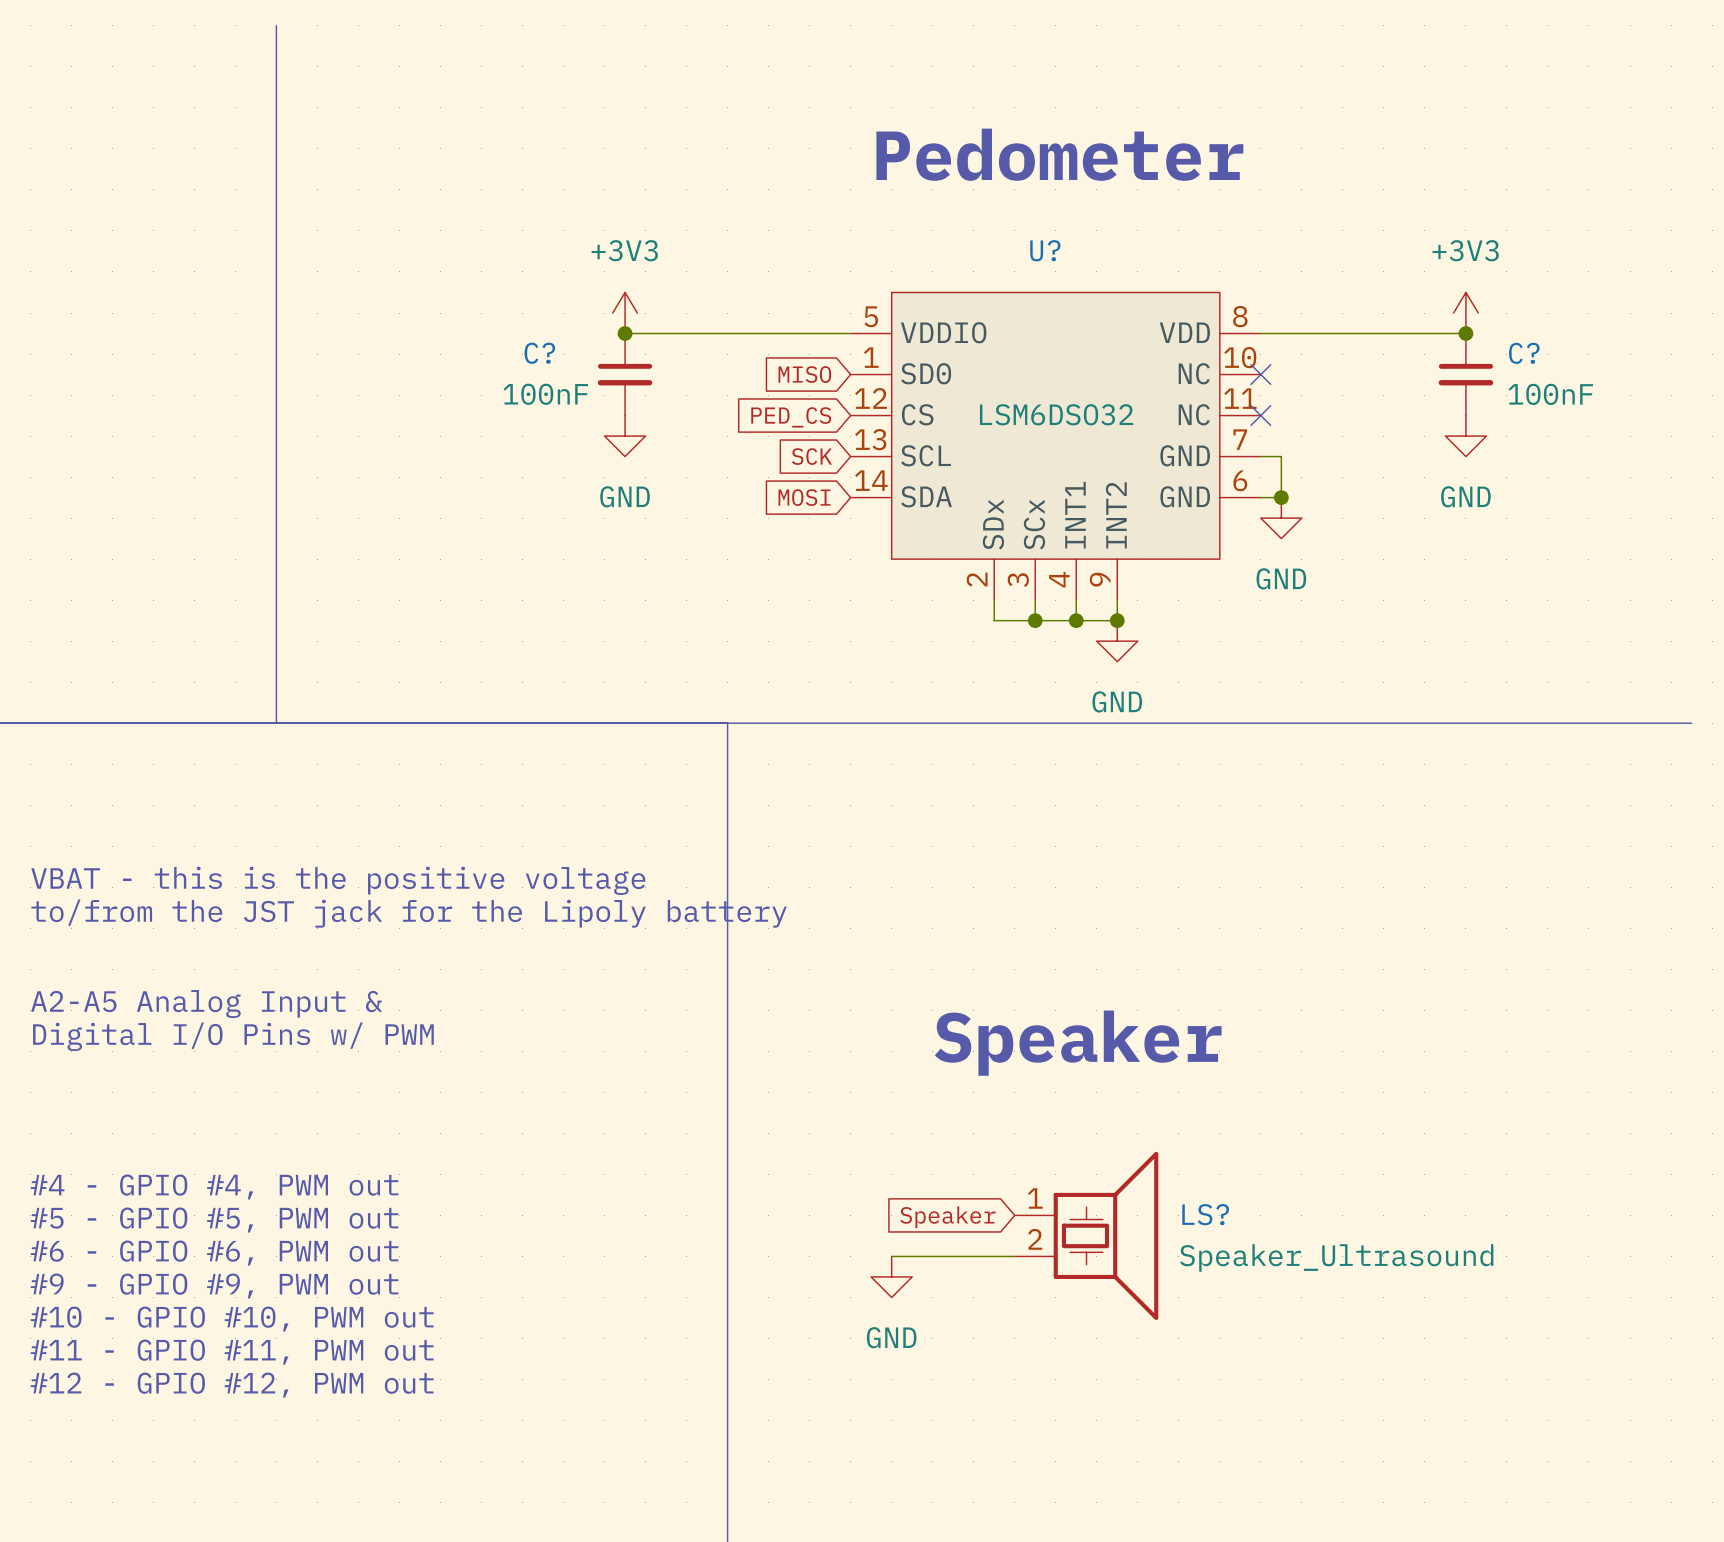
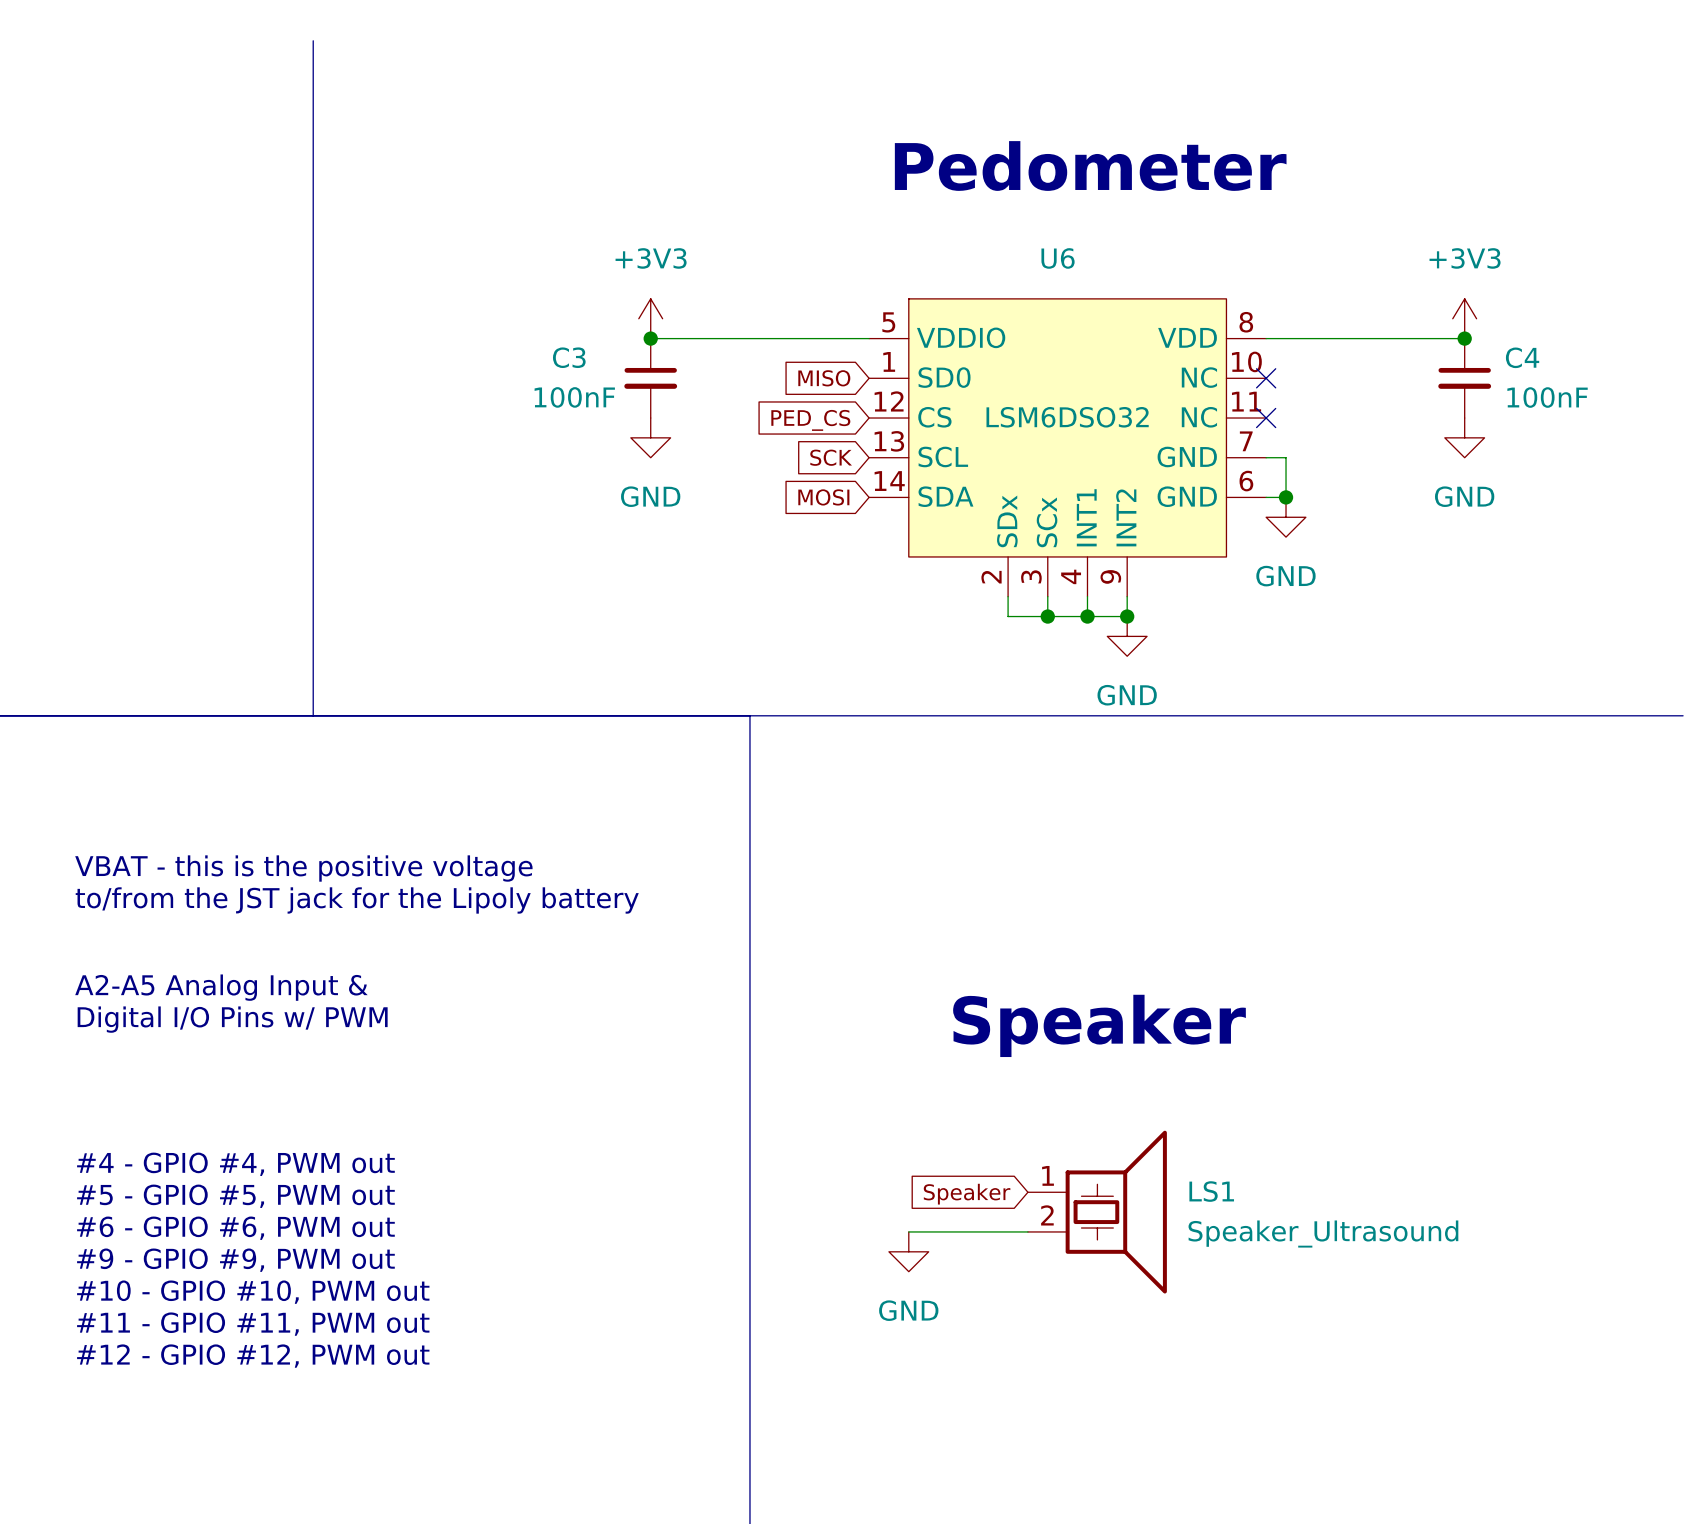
U? name: U? (1045, 250) -> U6 (1058, 258)
C? name: C? (539, 353) -> C3 (569, 357)
C? name: C? (1524, 353) -> C4 (1522, 357)
LS? name: LS? (1205, 1214) -> LS1 (1211, 1191)

